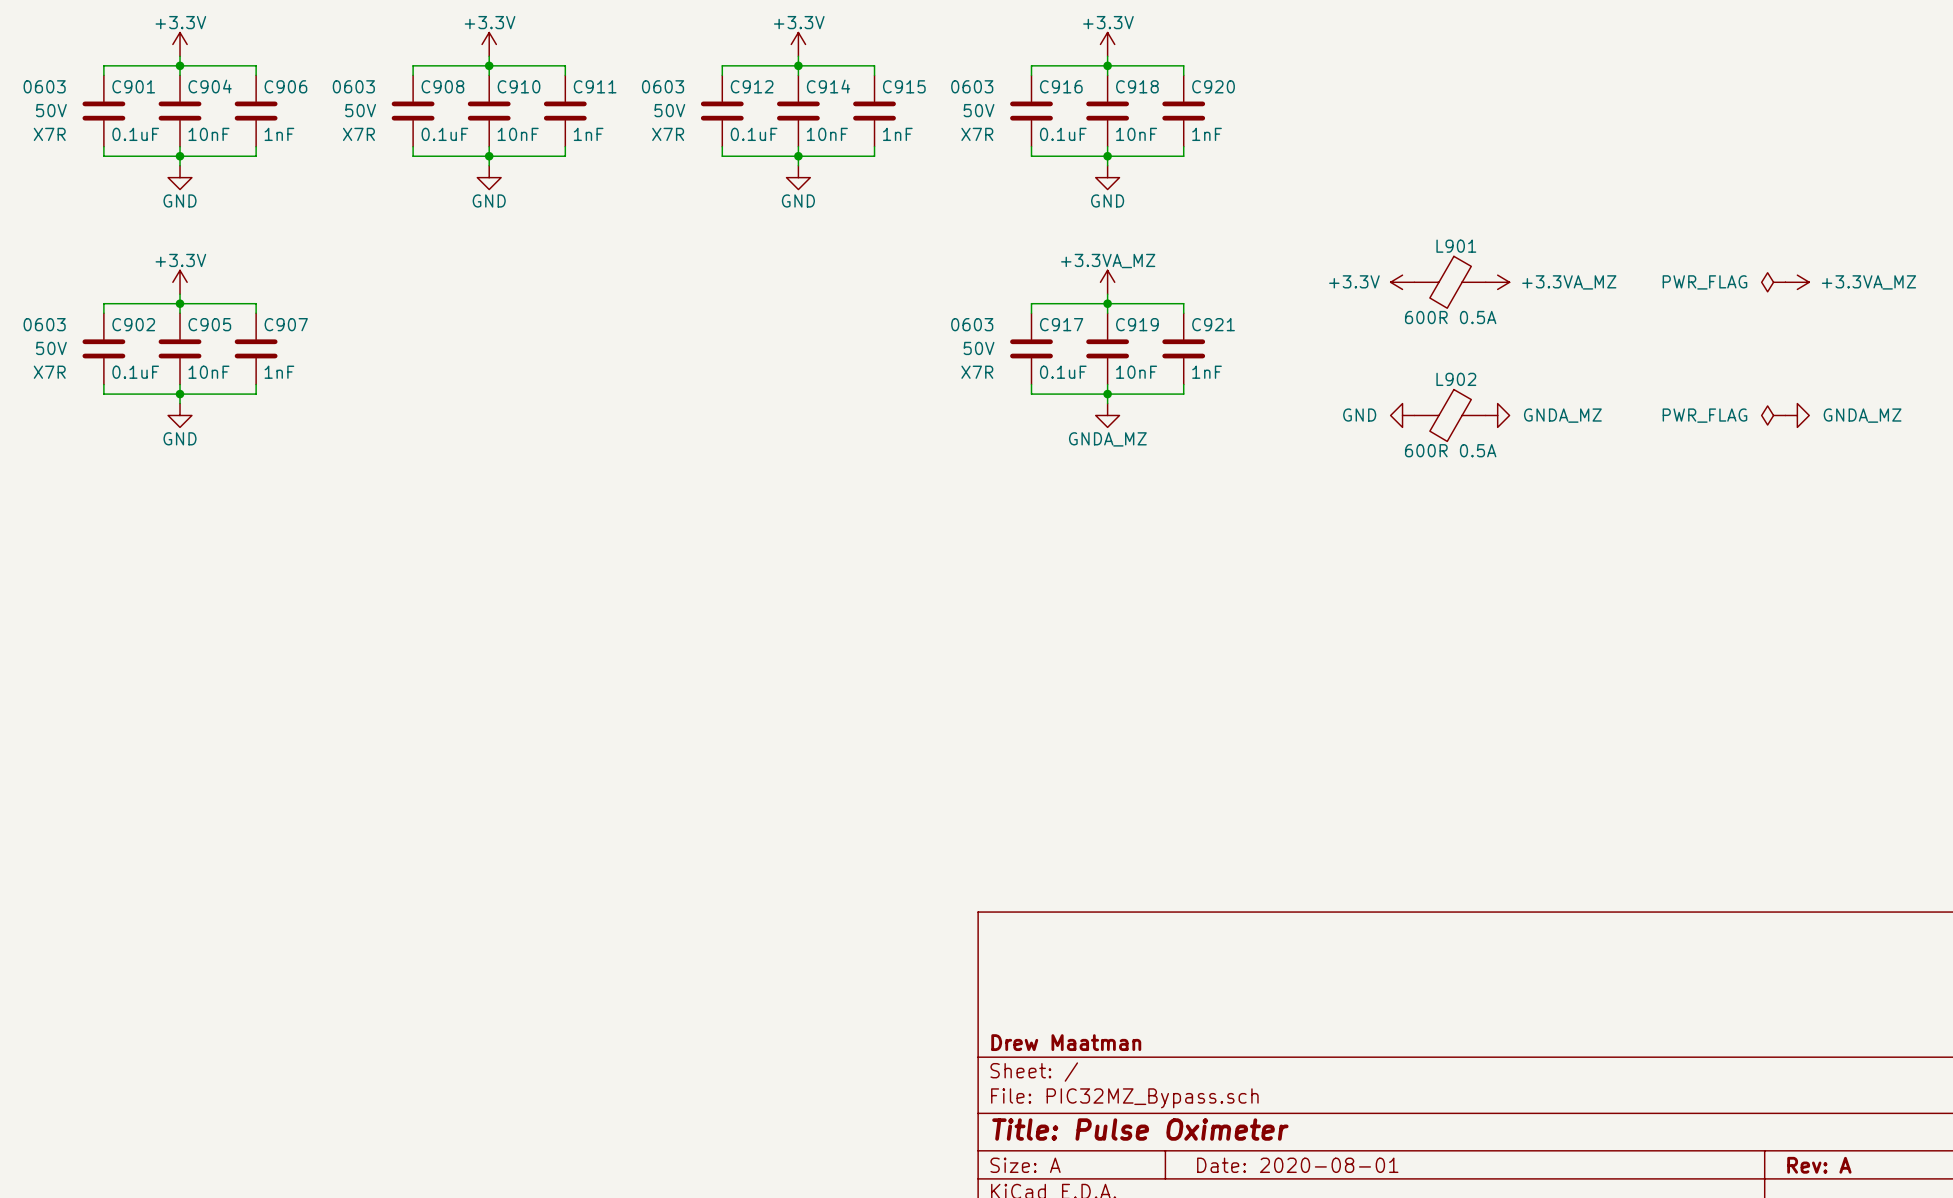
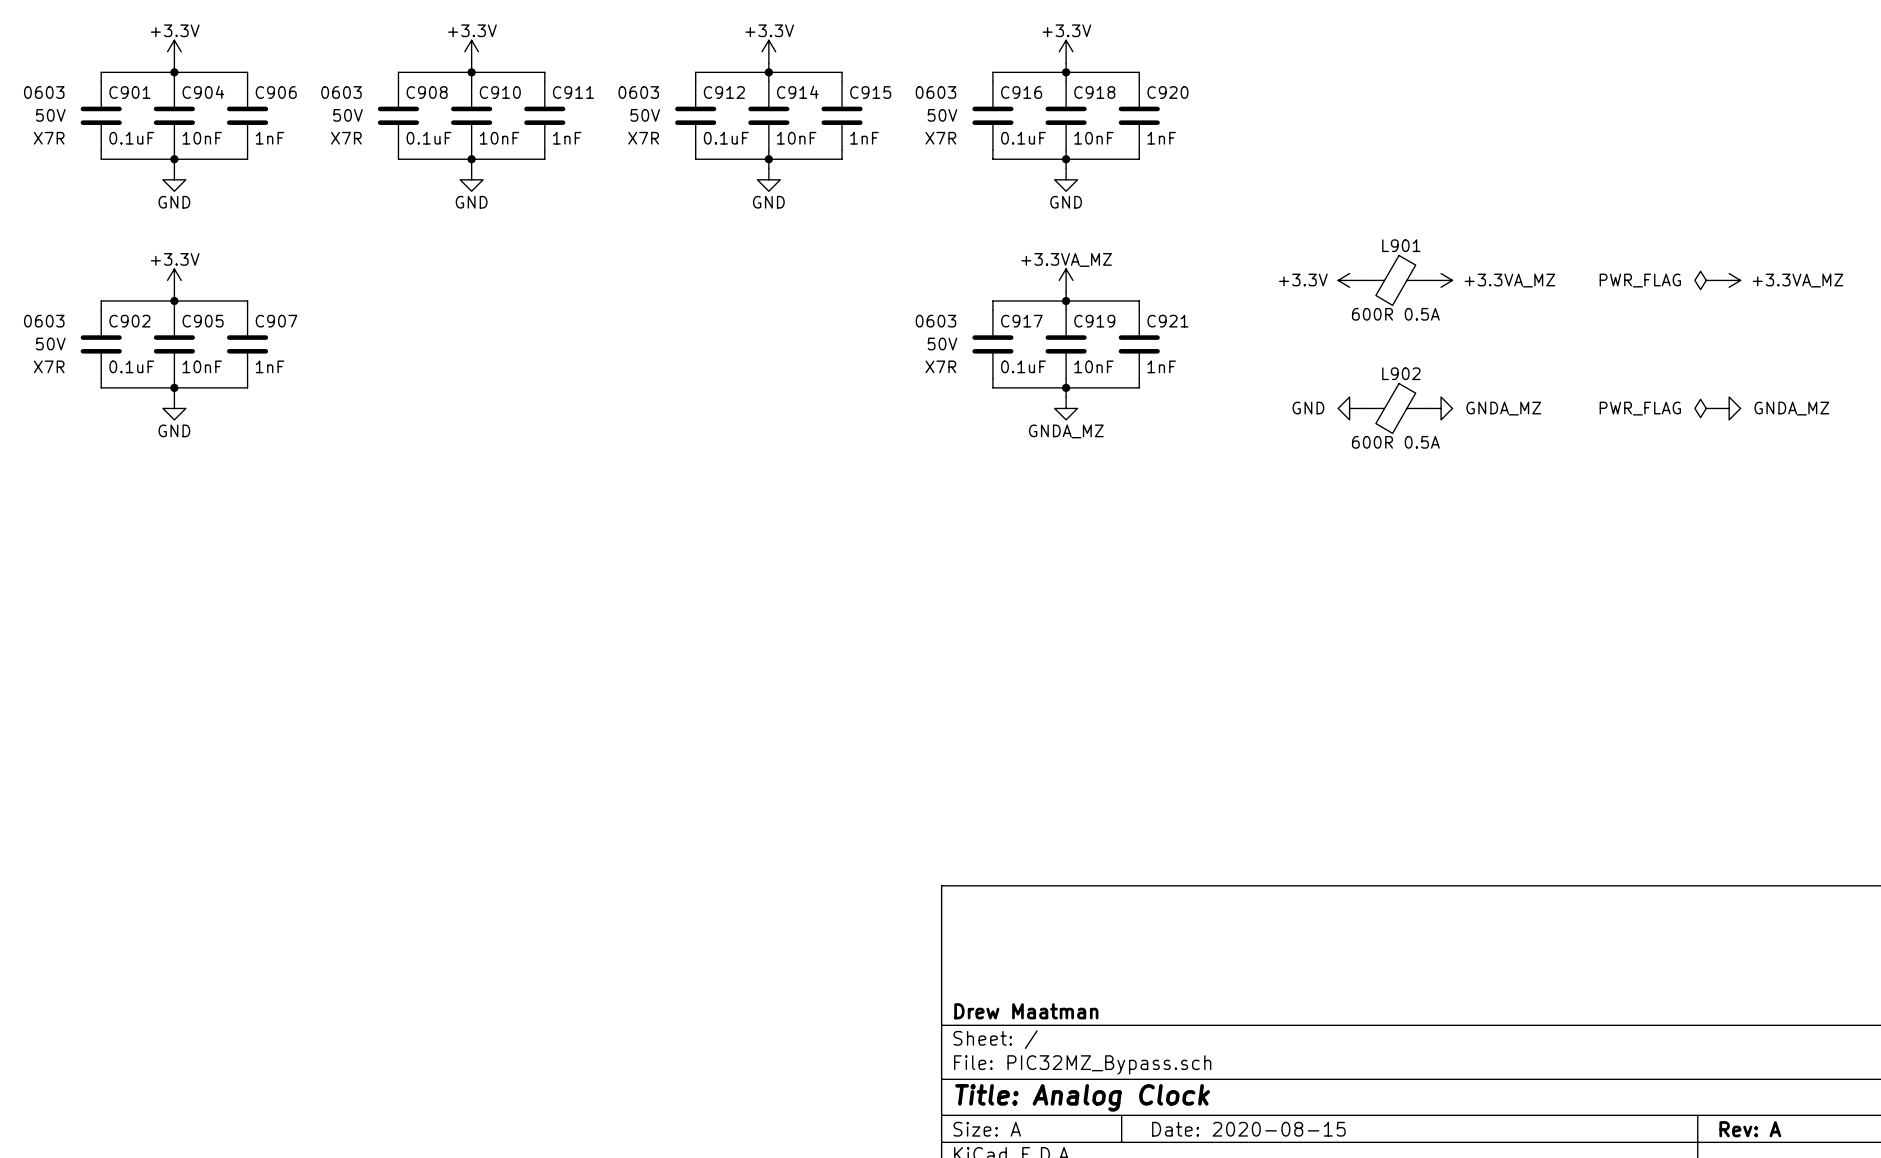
title block: Title: Pulse Oximeter (1140, 1129) -> Title: Analog Clock (1082, 1097)
title block: Date: 2020-08-01 (1297, 1165) -> Date: 2020-08-15 (1248, 1129)

